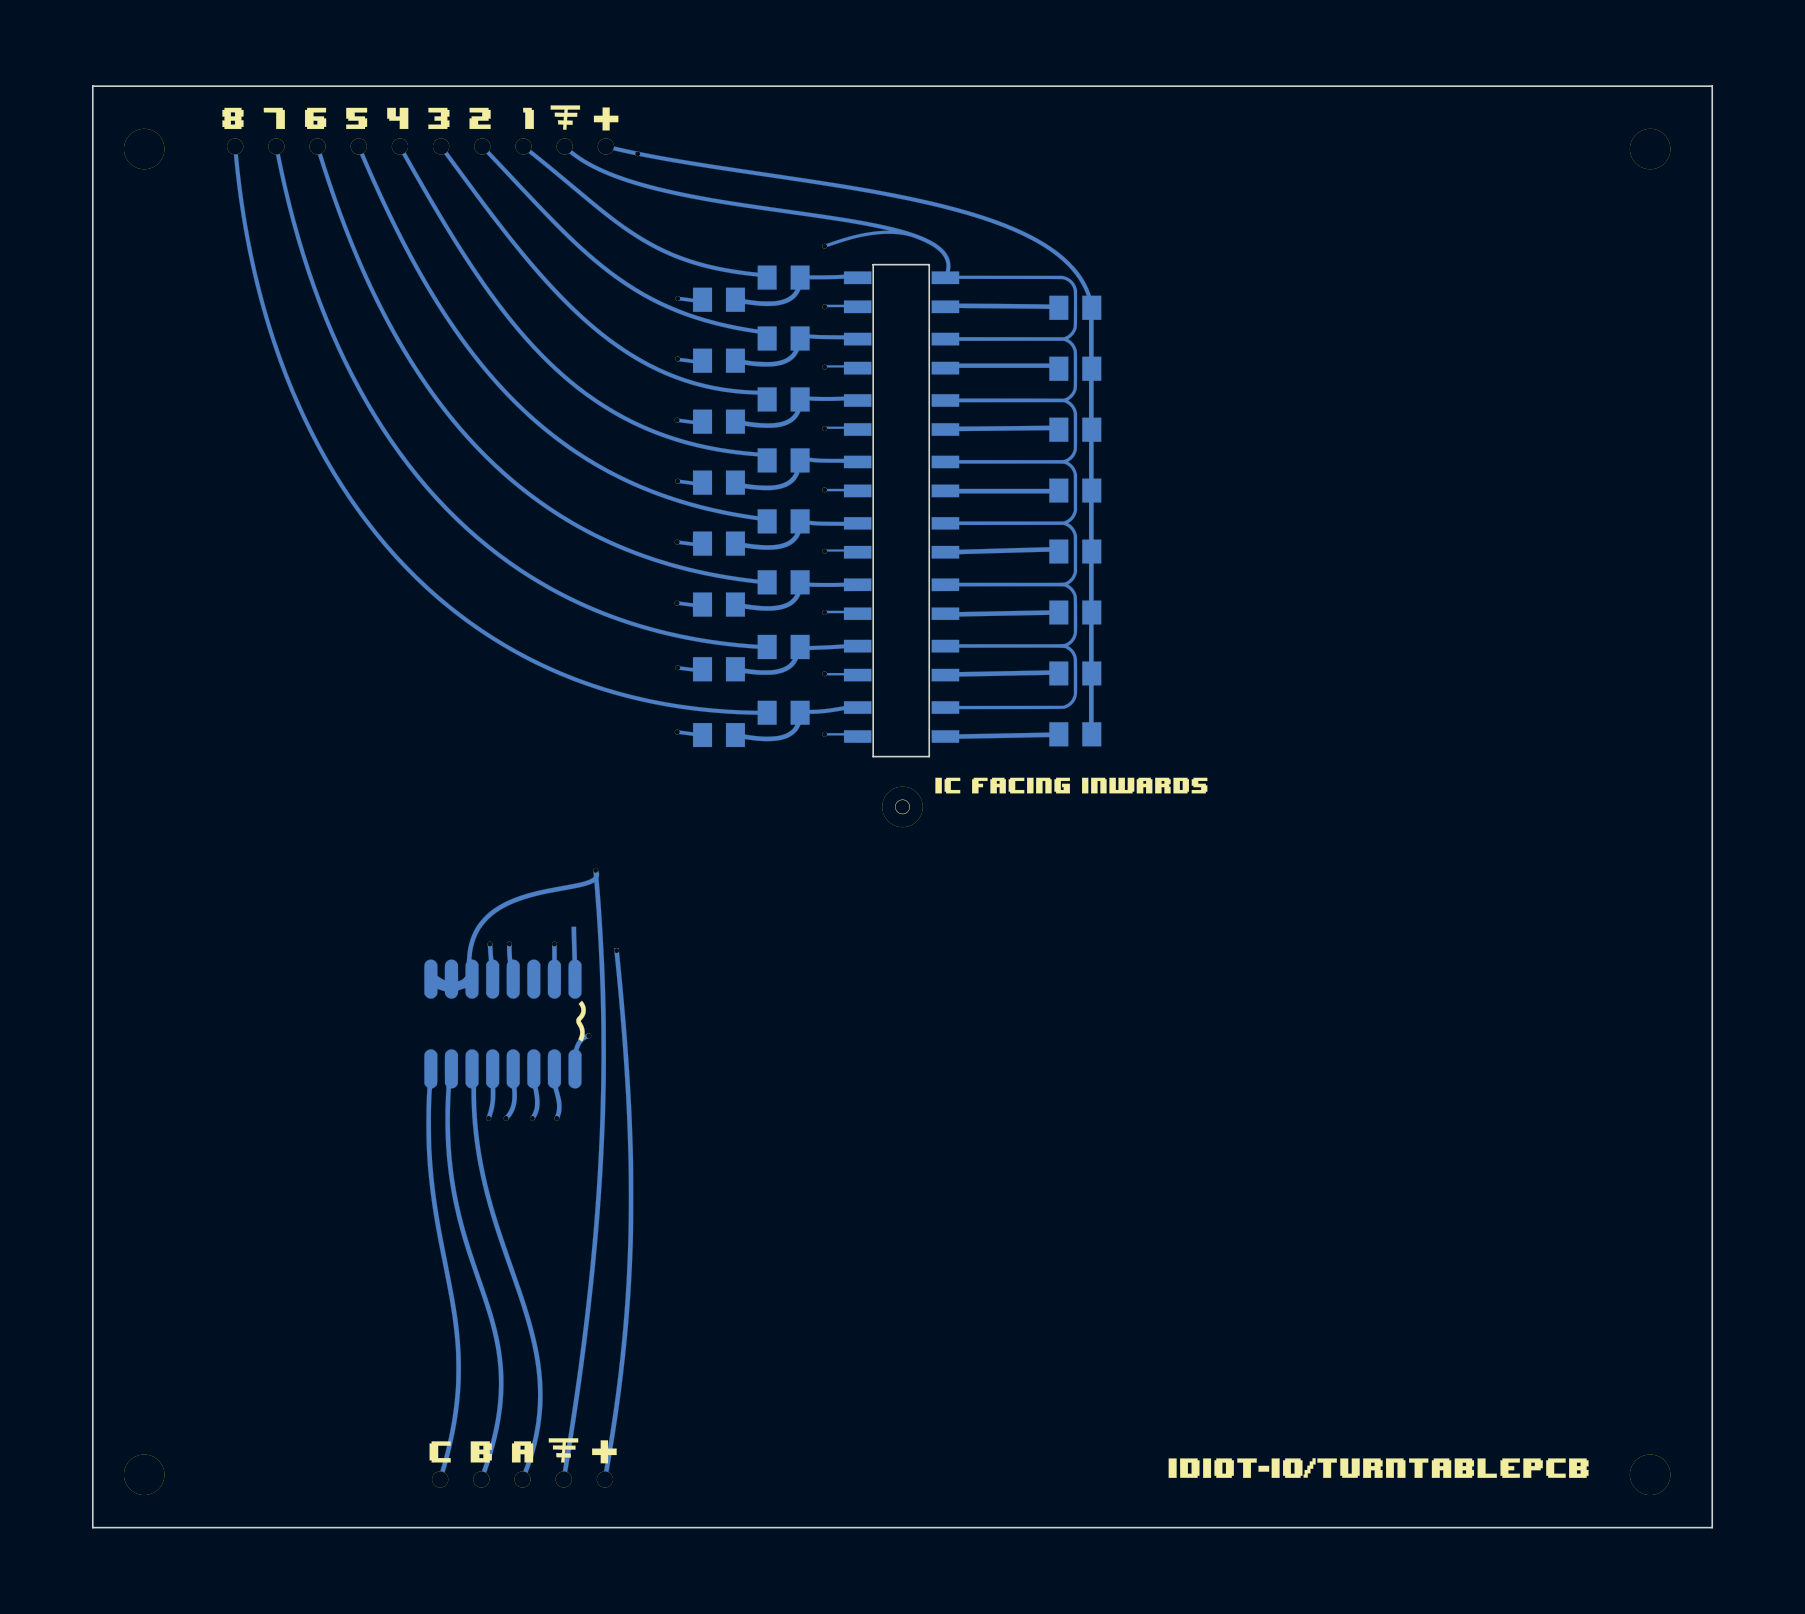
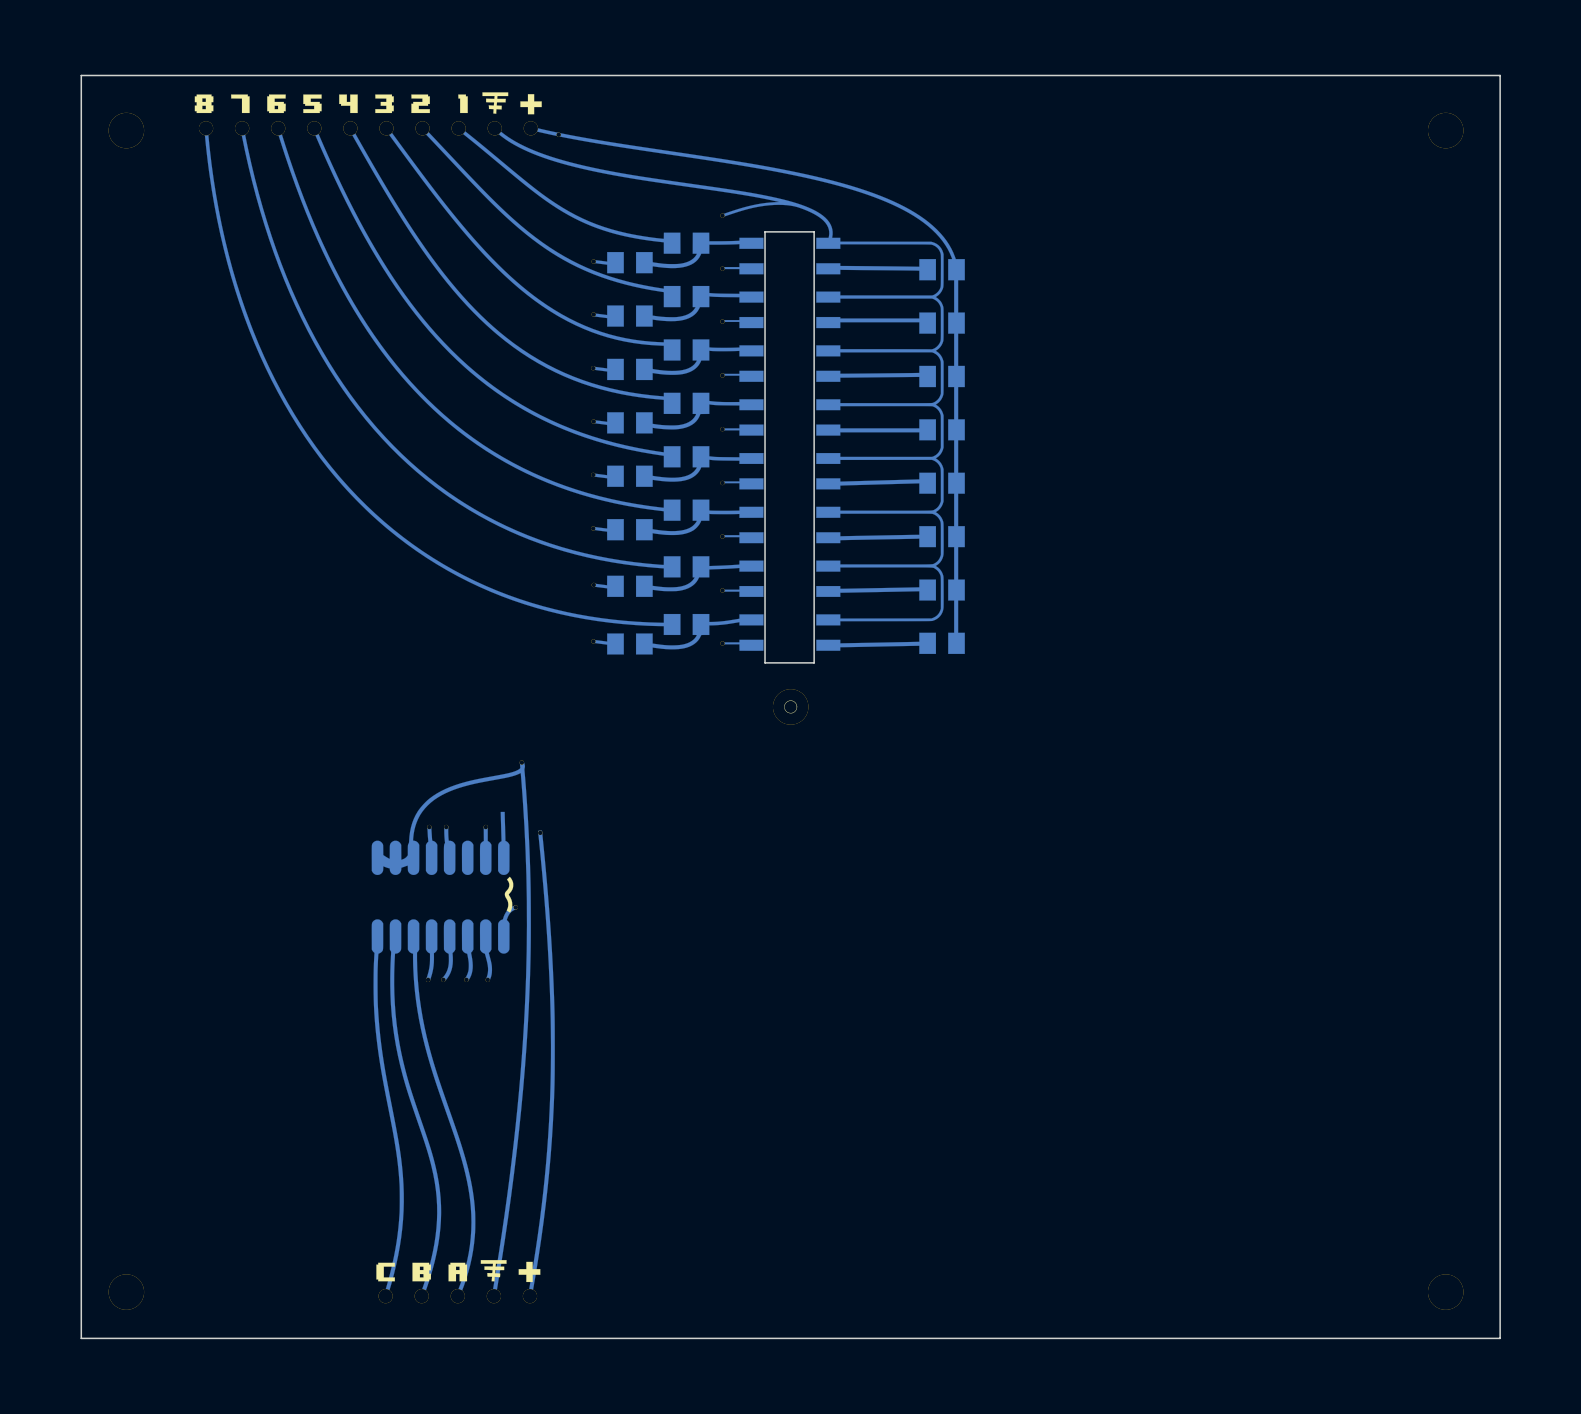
drawing: [222, 105, 1589, 1478] -> none

